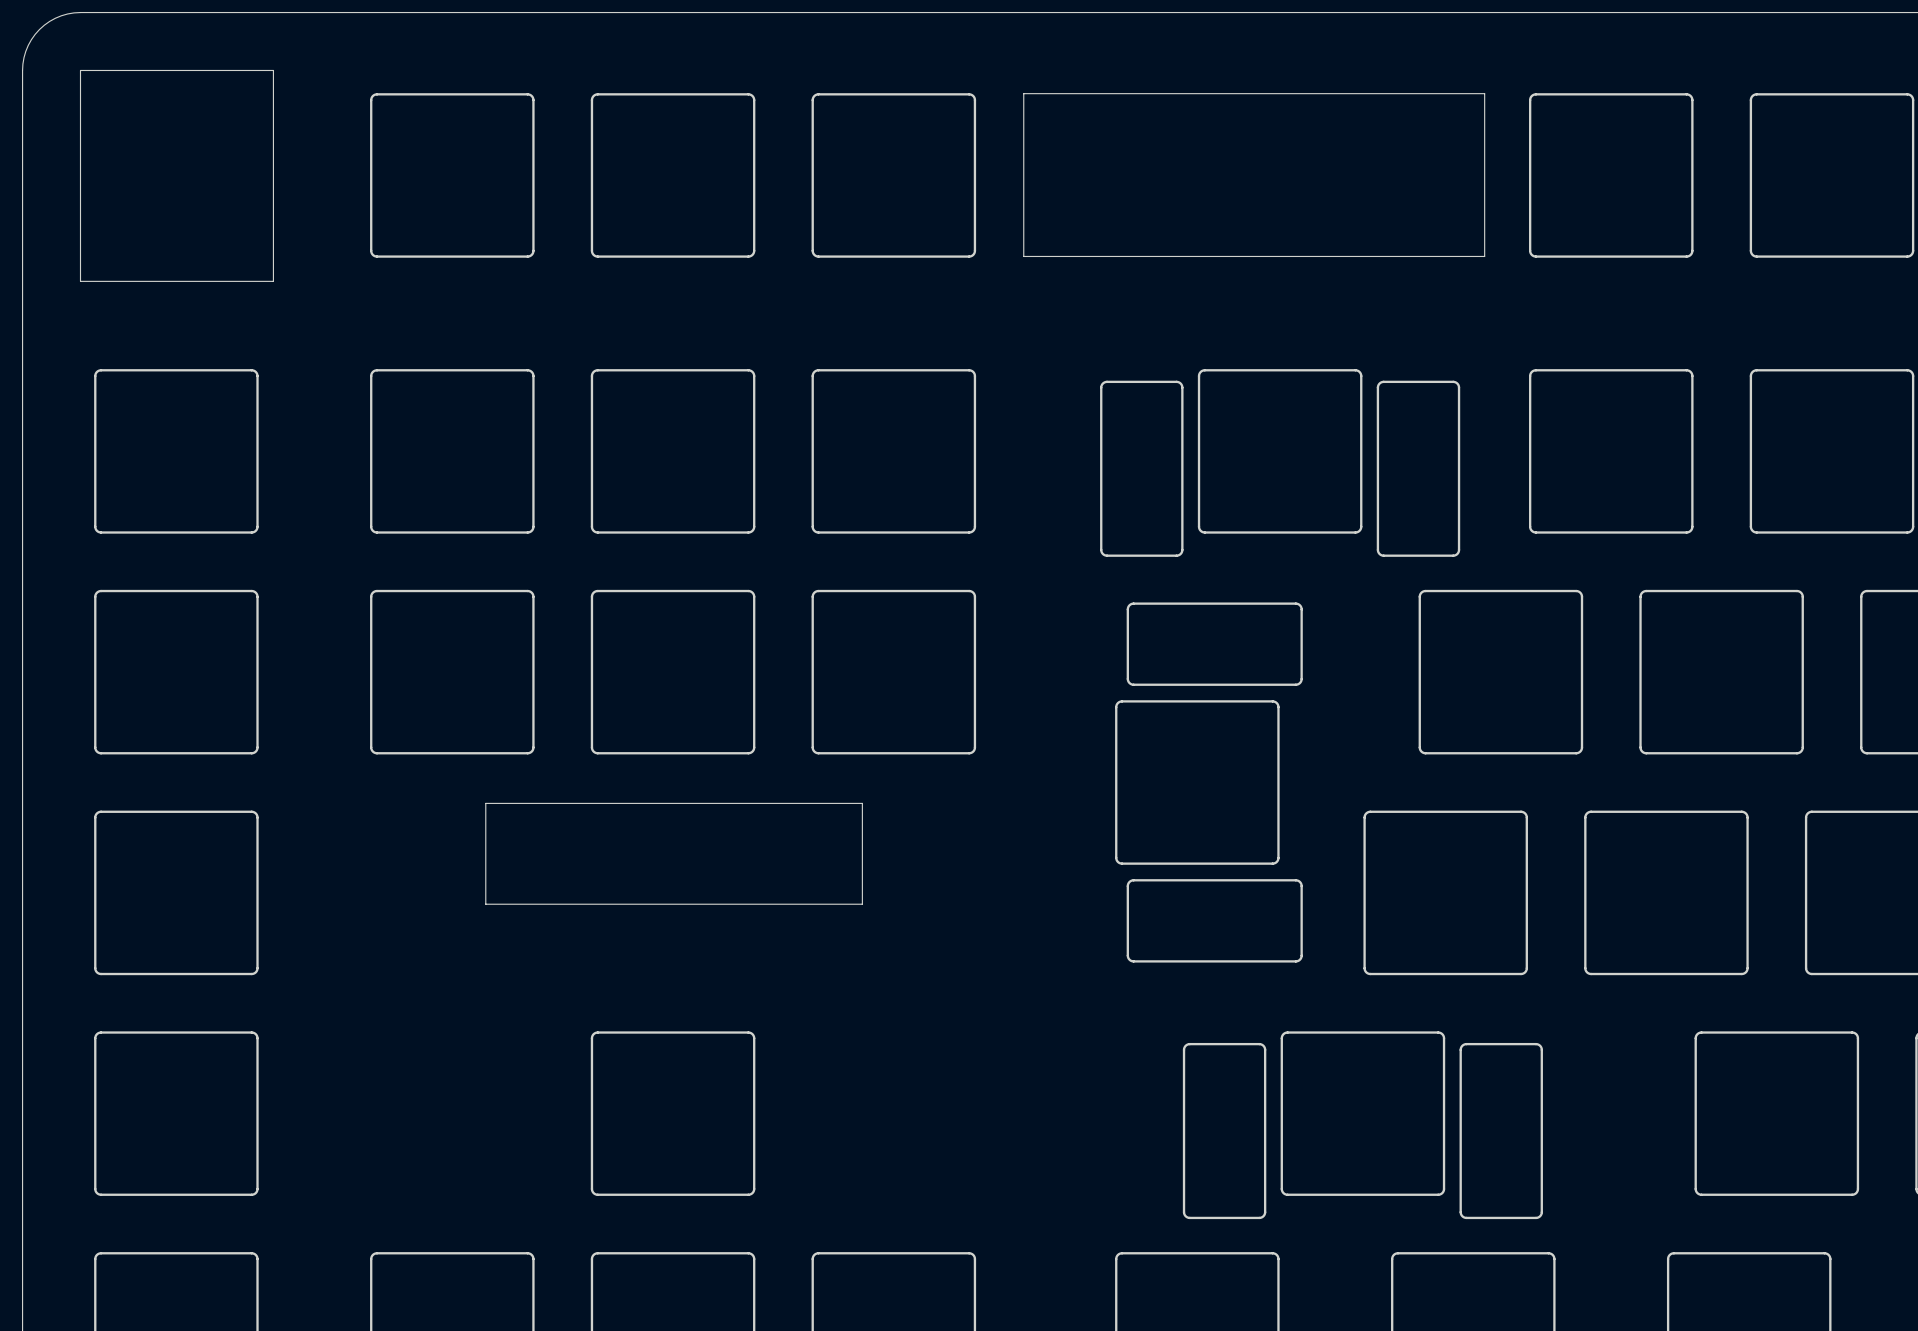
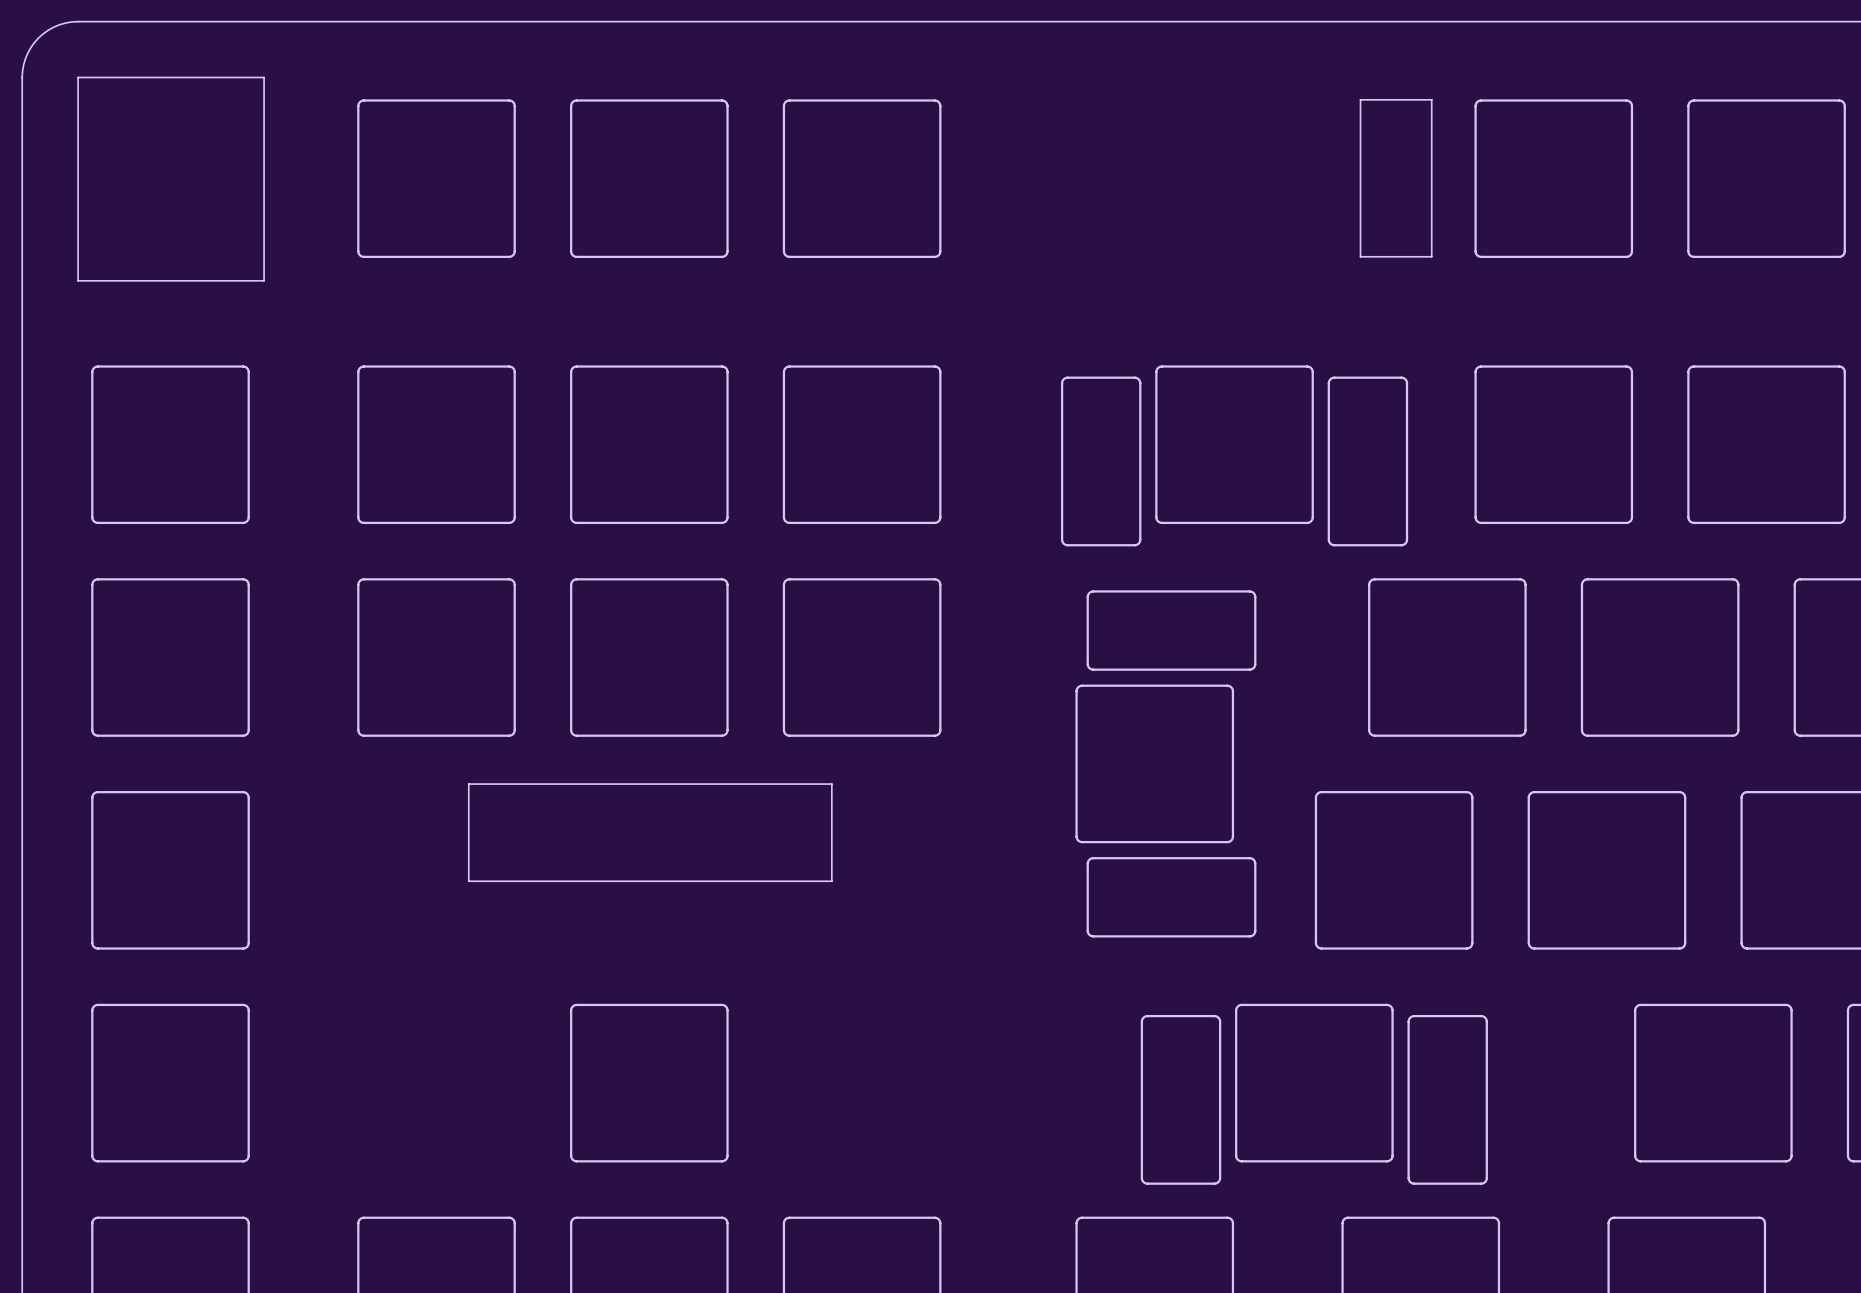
board edge: (1410, 93) (1023, 93) (1023, 256) (1410, 256) -> (1360, 99) (1360, 256)

